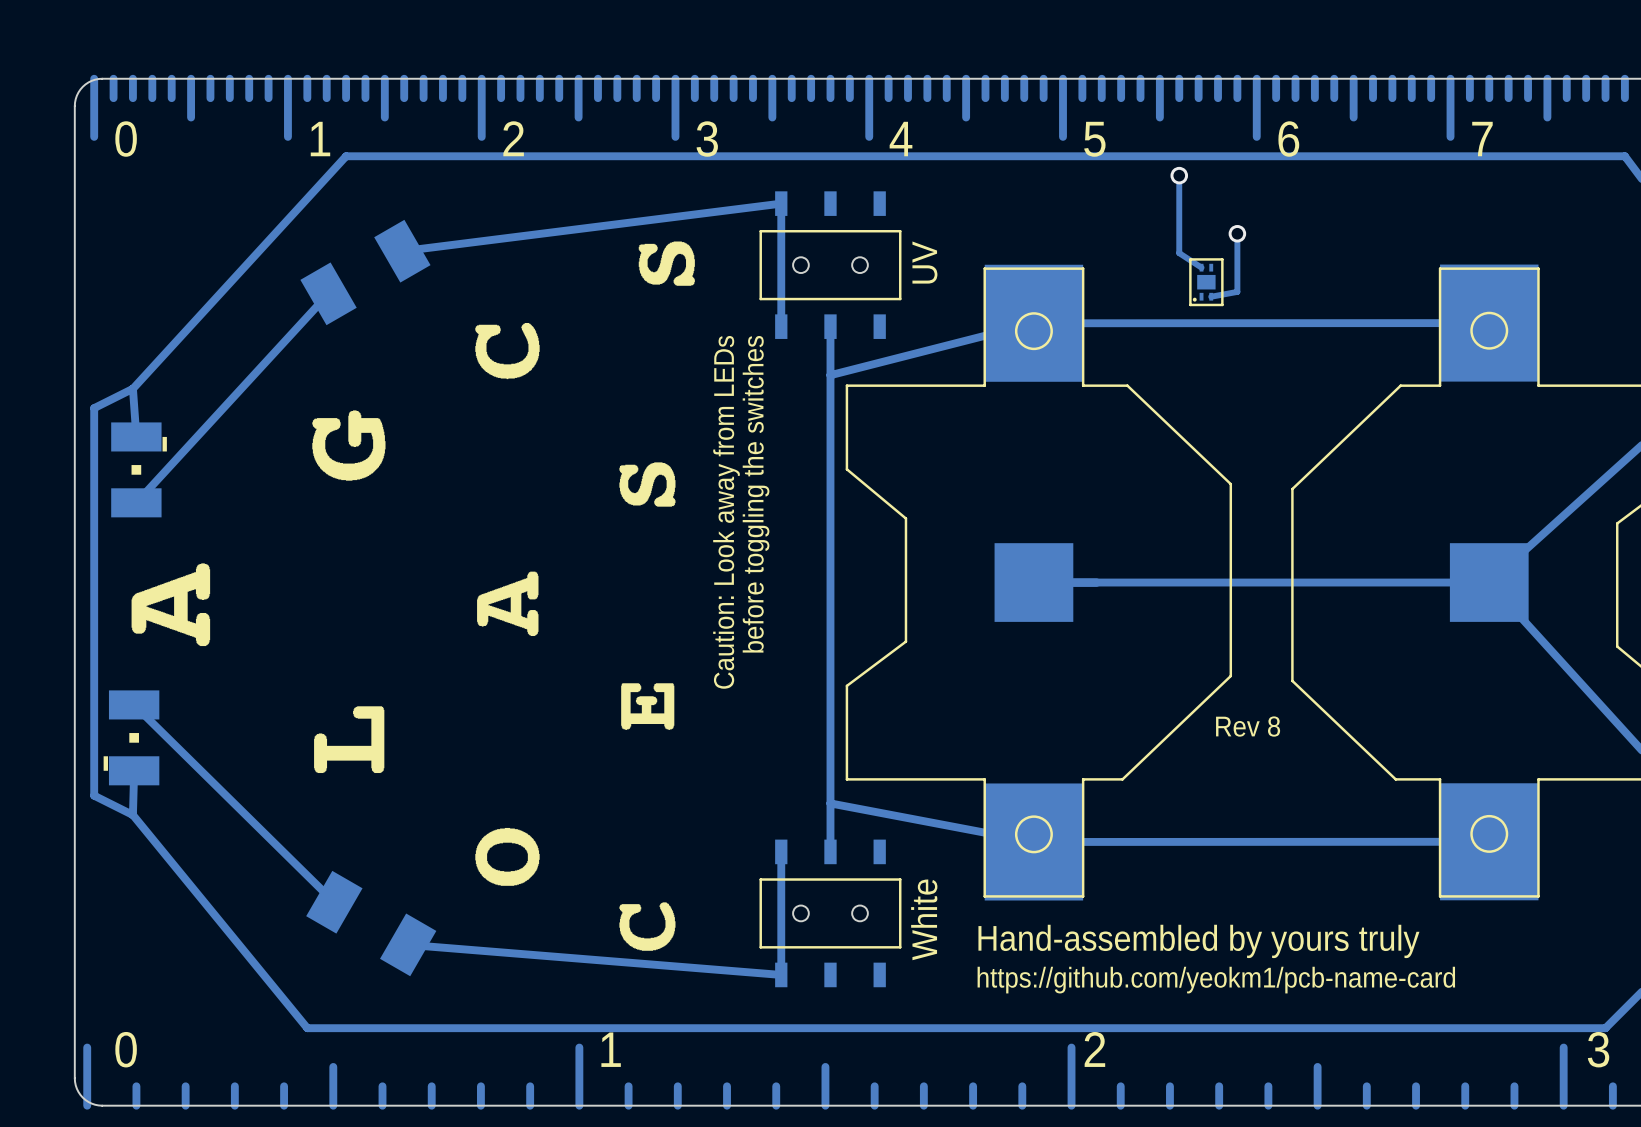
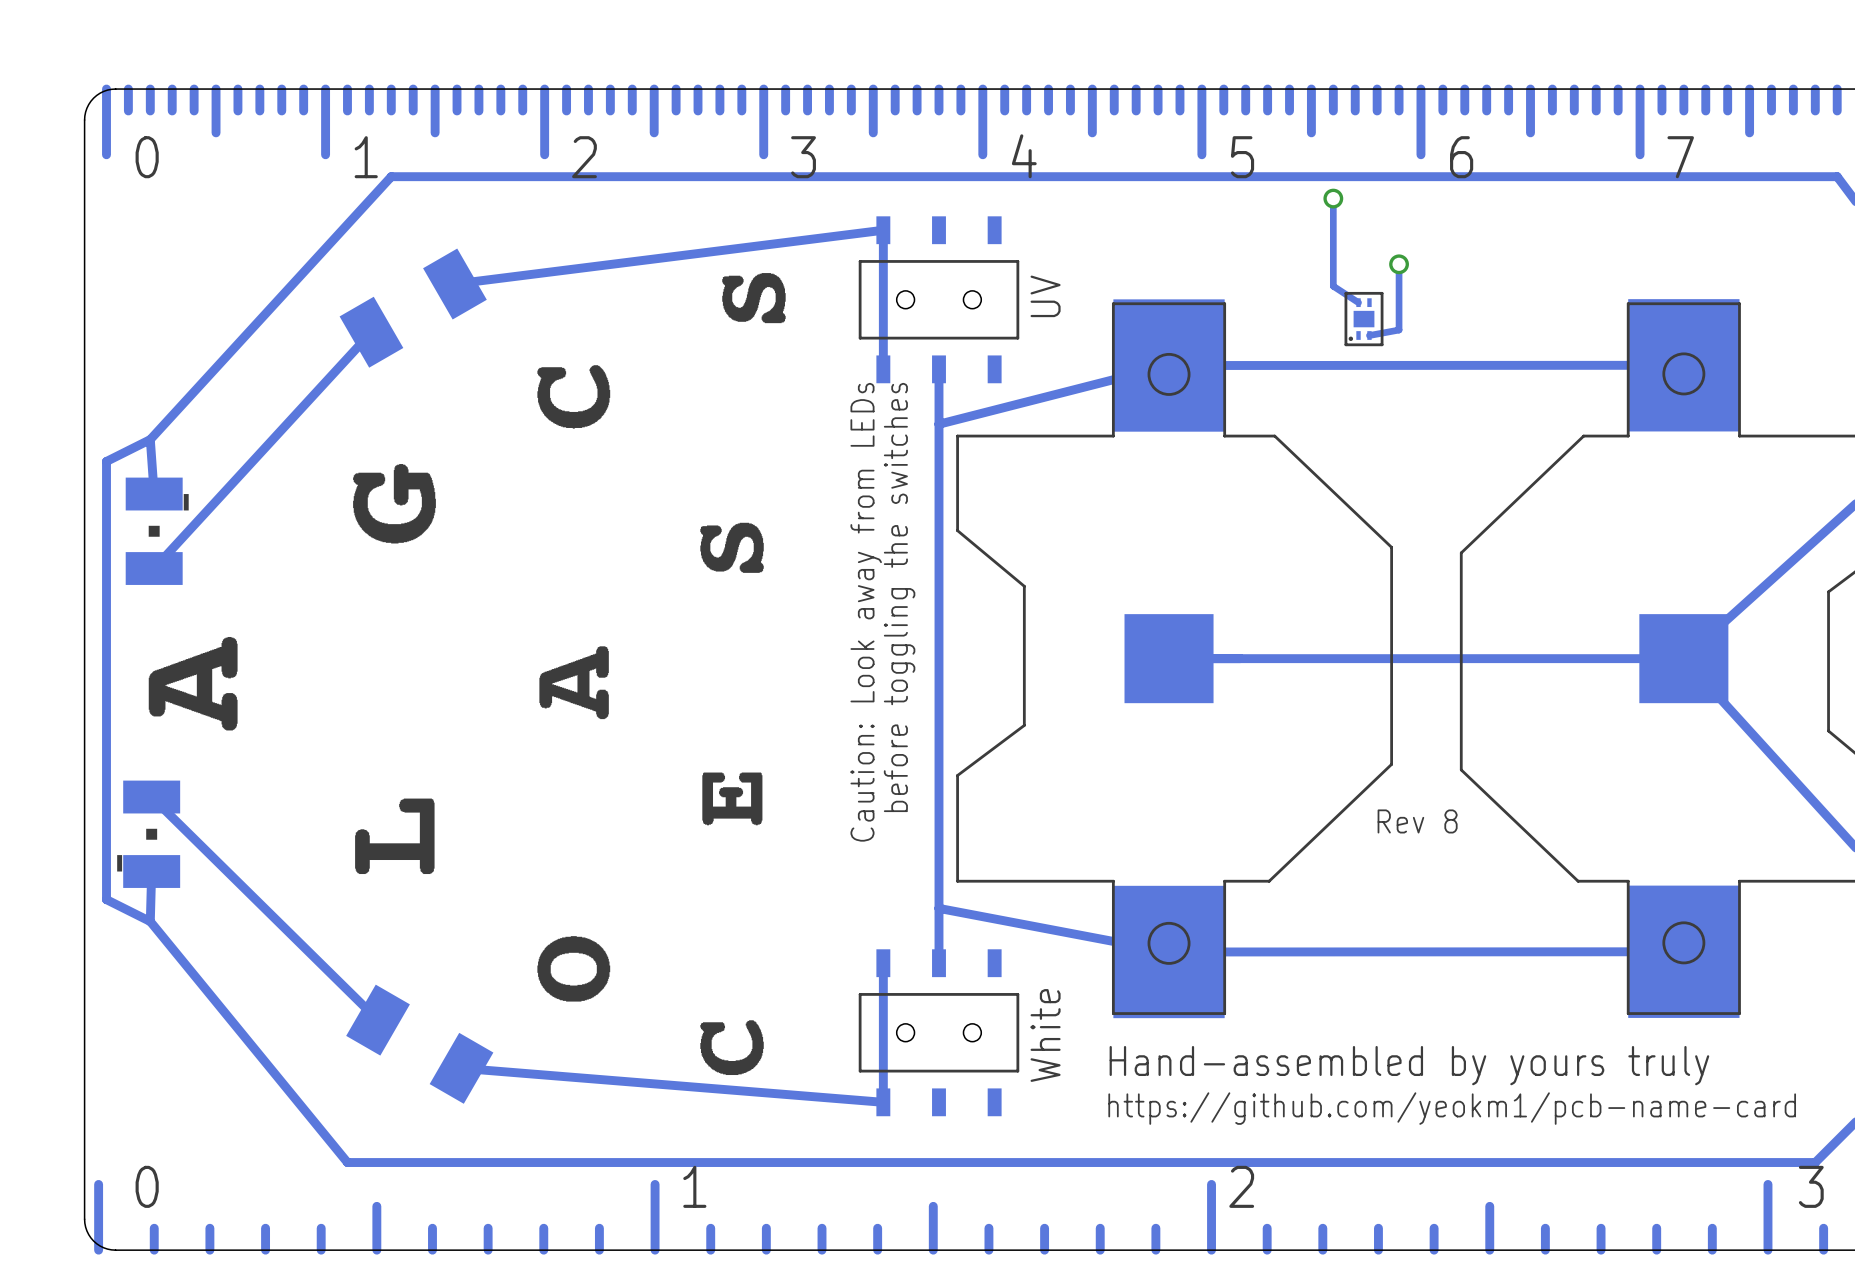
text position: before toggling the switches (756, 494) -> before toggling the switches (899, 597)
text position: Caution: Look away from LEDs (726, 512) -> Caution: Look away from LEDs (866, 612)

